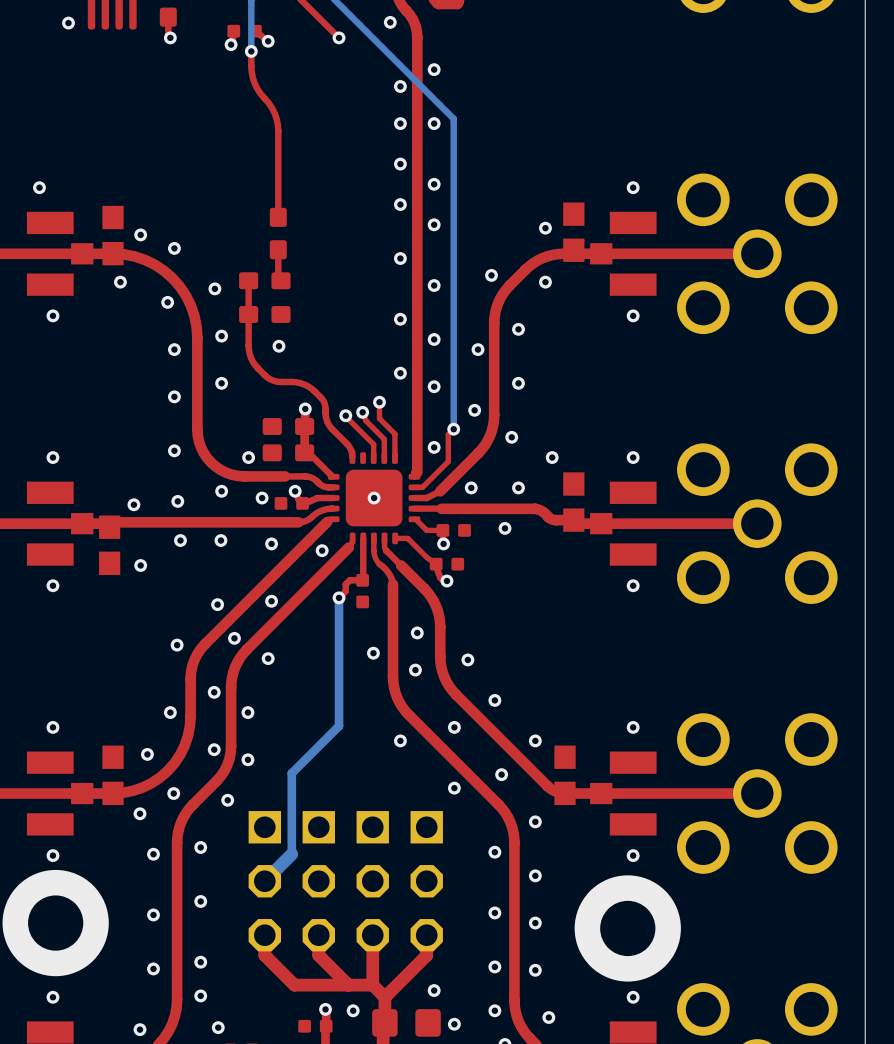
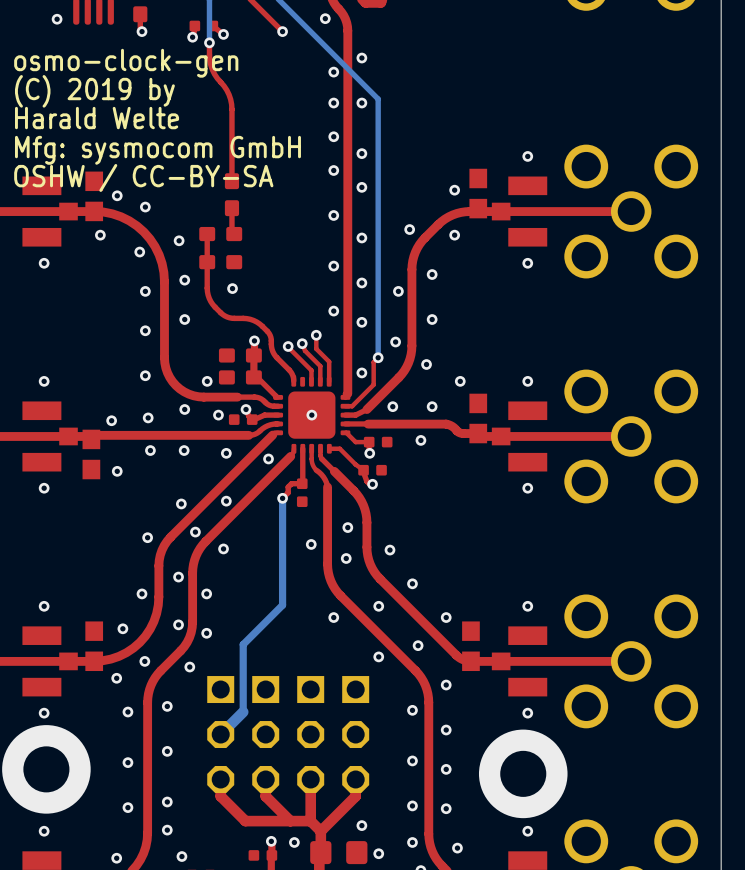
text: none -> osmo-clock-gen (126, 63)
text: none -> (C) 2019 by (94, 91)
text: none -> Harald Welte (97, 118)
text: none -> Mfg: sysmocom GmbH (157, 150)
via: (39, 187) -> none
text: none -> OSHW / CC-BY-SA (143, 177)

